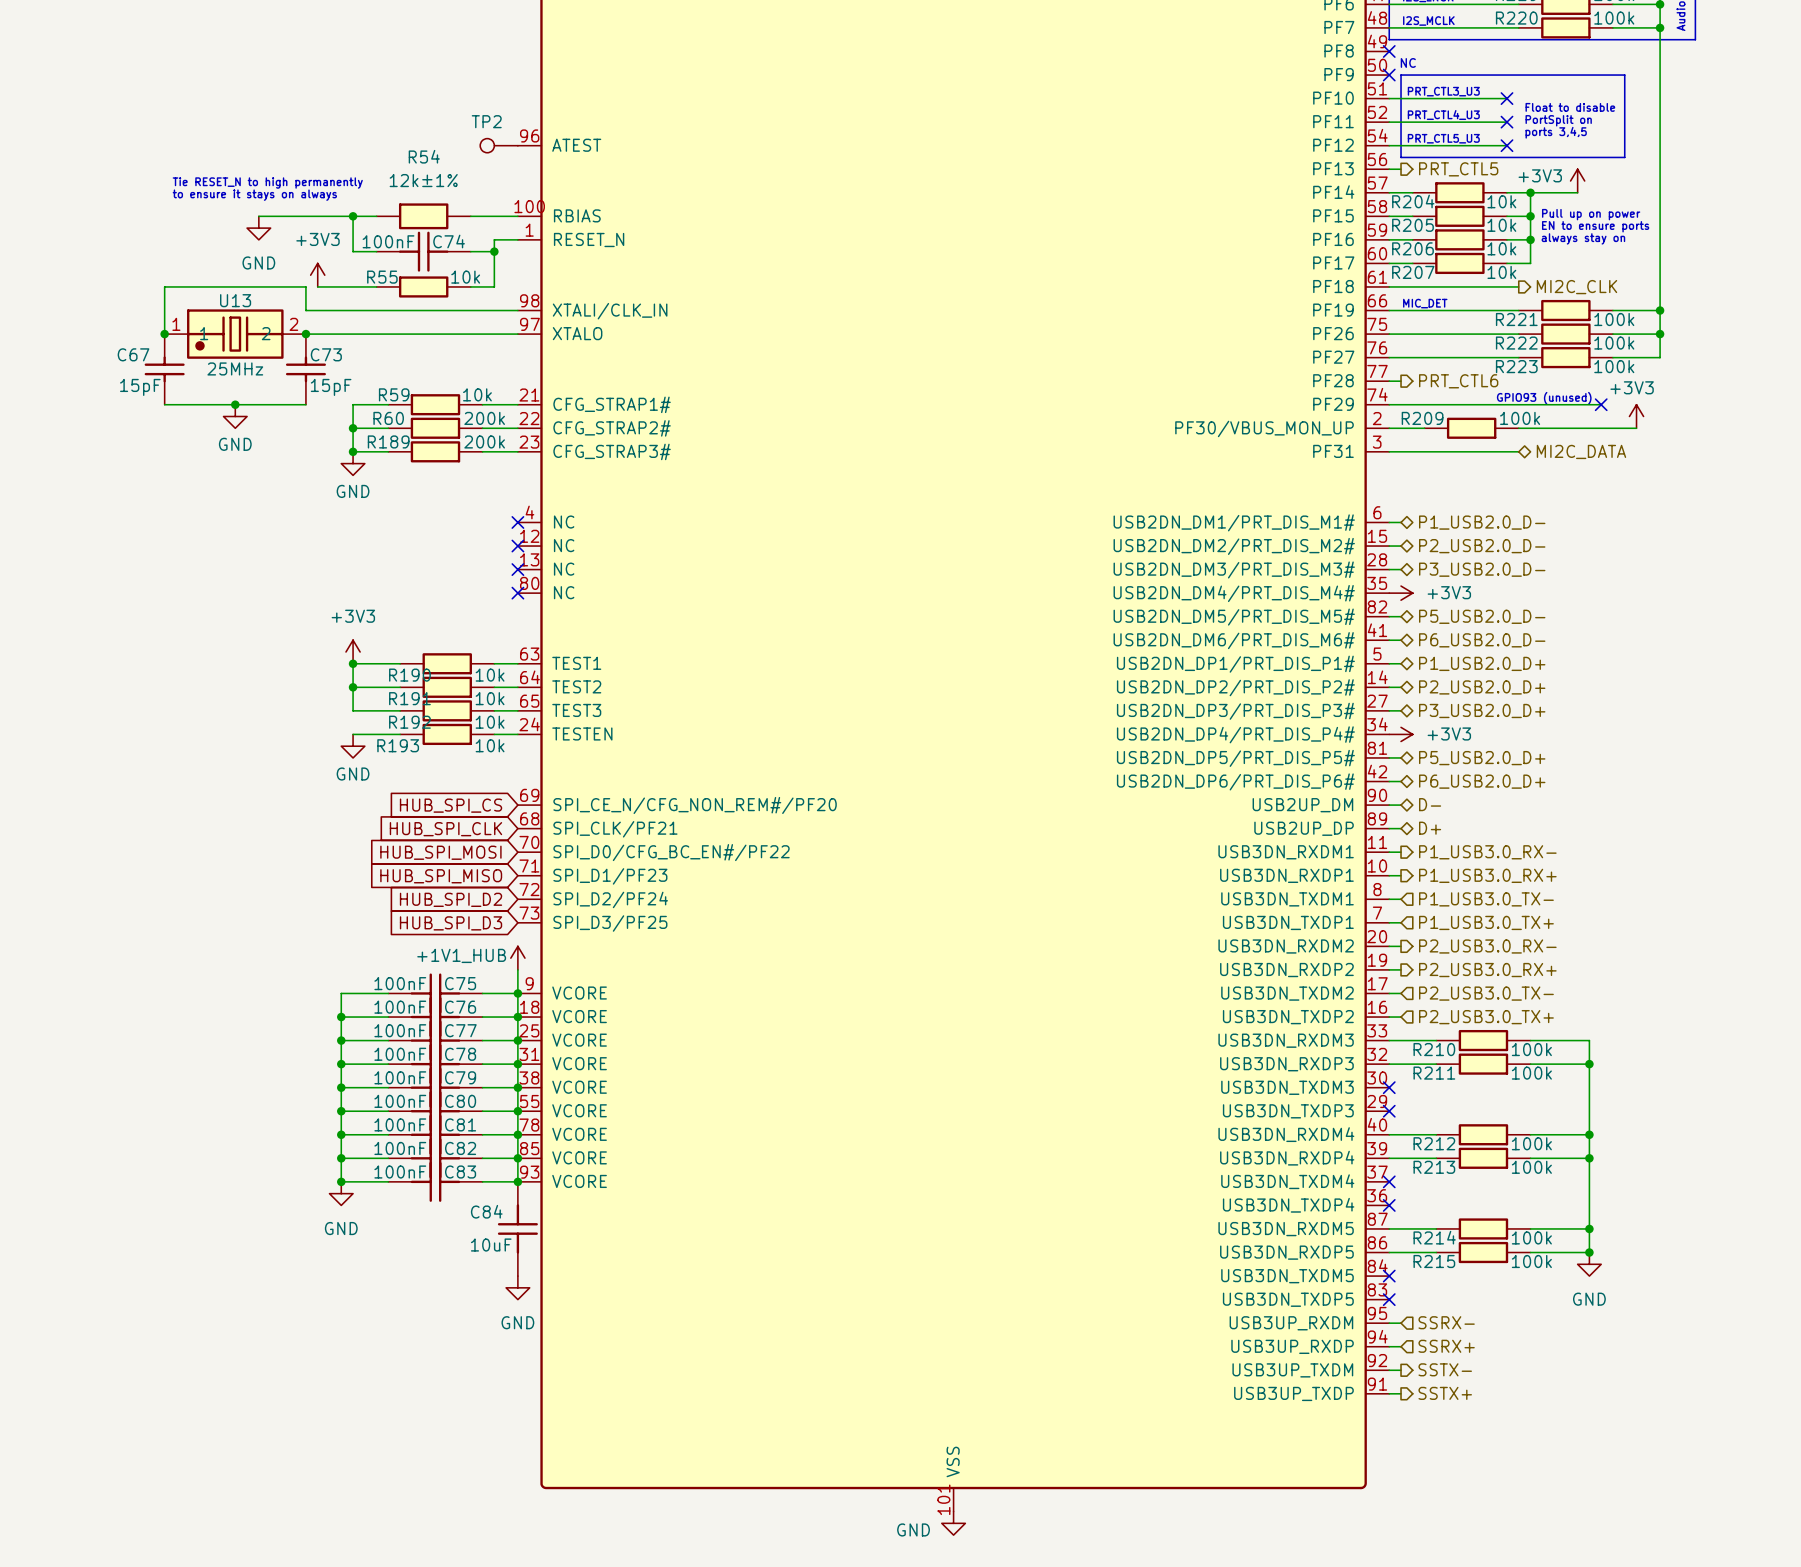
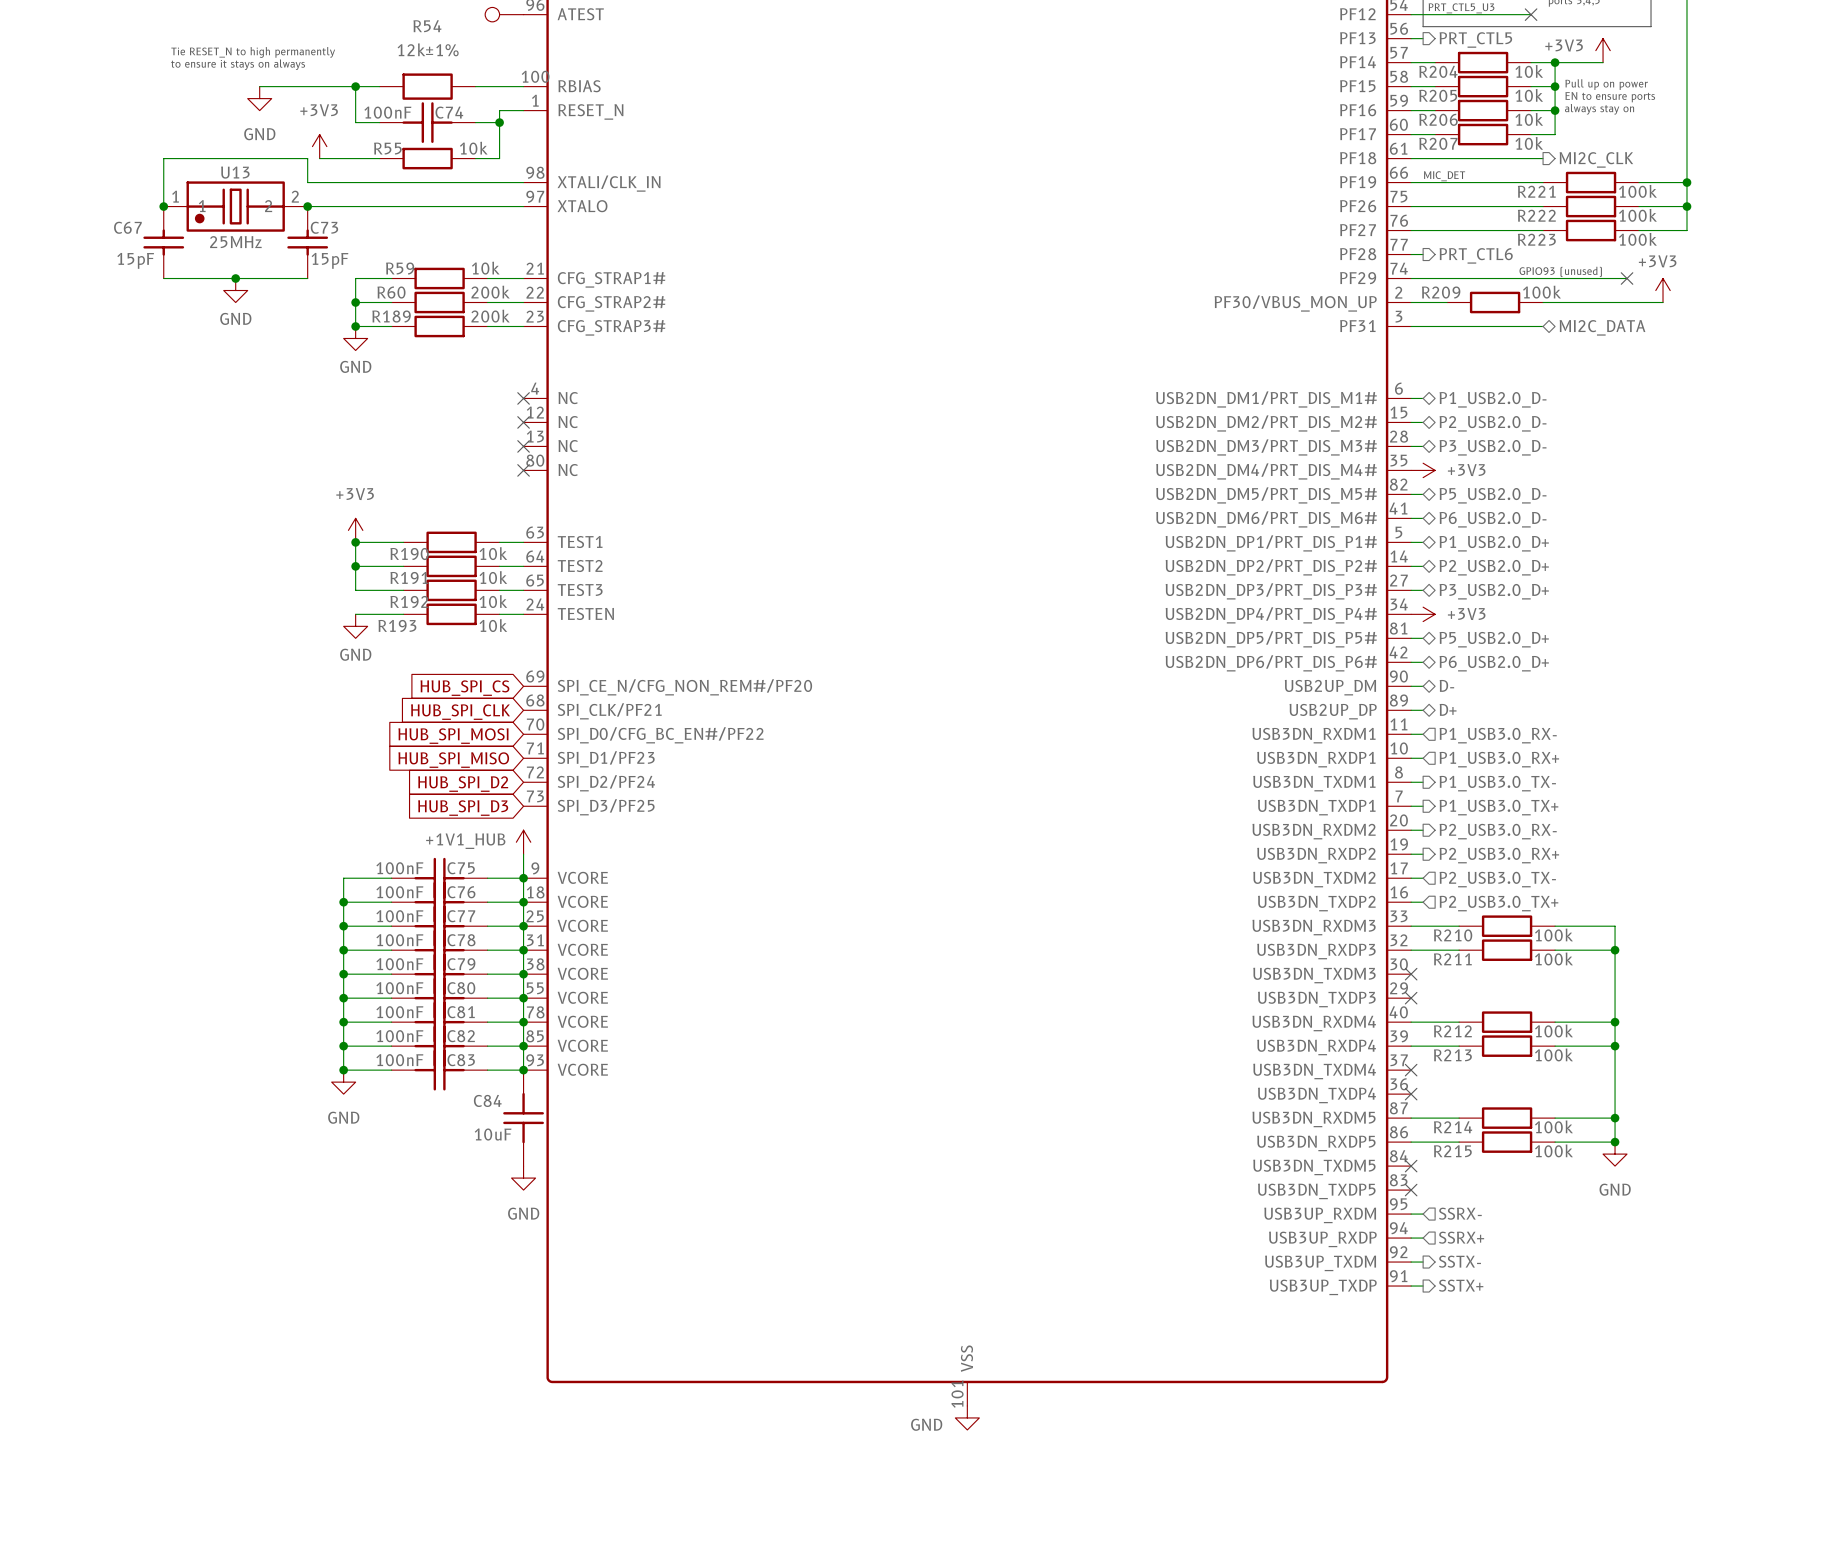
hierarchical label shape: output (1487, 852) -> input (1498, 735)
hierarchical label shape: output (1487, 875) -> input (1499, 759)
hierarchical label shape: input (1486, 899) -> output (1497, 783)
hierarchical label shape: input (1486, 922) -> output (1498, 807)

